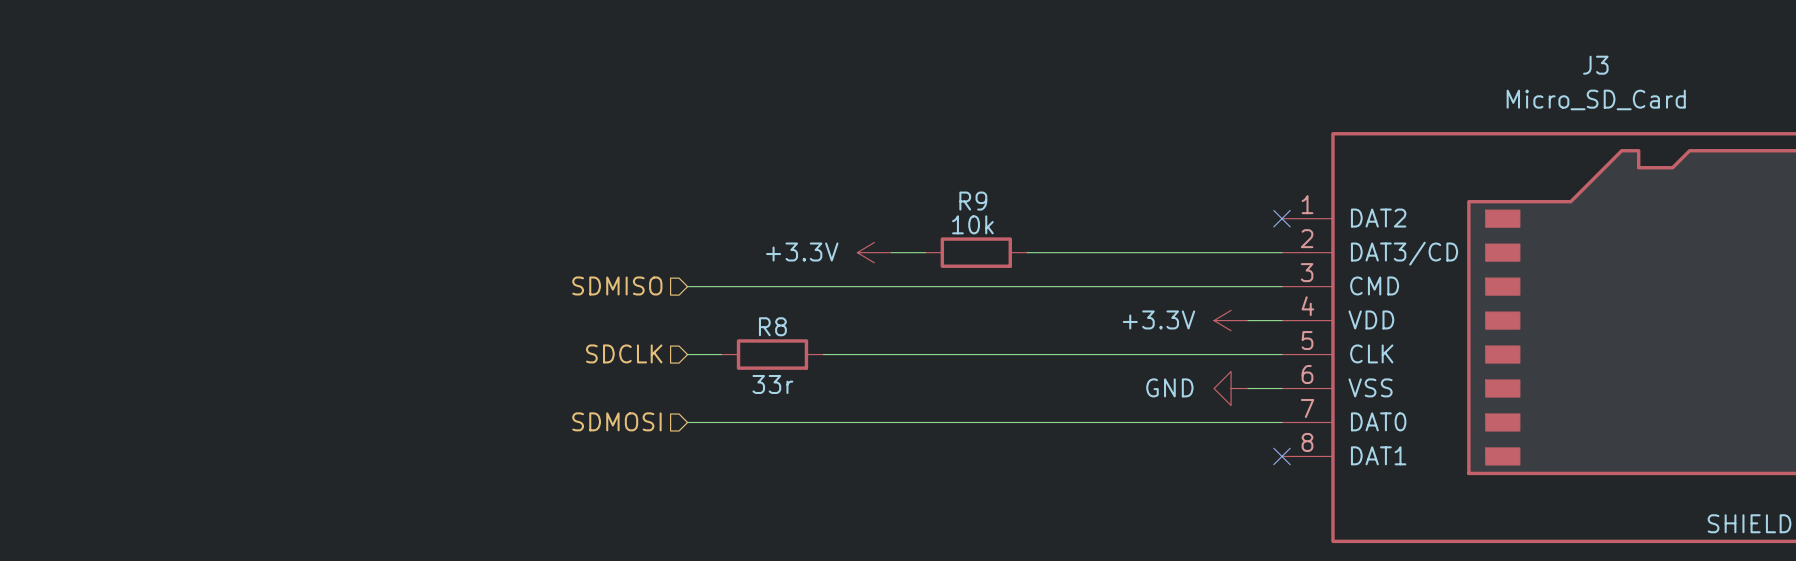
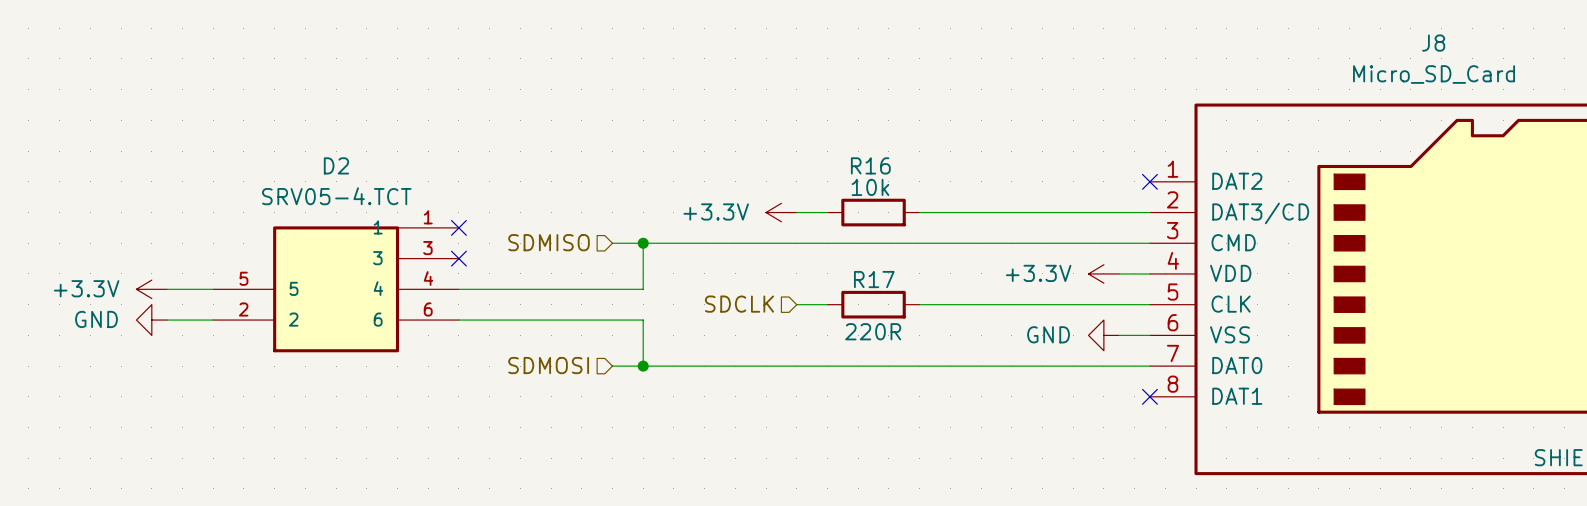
J3 name: J3 (1595, 65) -> J8 (1433, 43)
R9 name: R9 (973, 201) -> R16 (870, 165)
no-connect mark: none -> (458, 227)
wire: none -> (643, 243) (643, 289) (458, 289)
junction: none -> (643, 243)
no-connect mark: none -> (458, 258)
power symbol: none -> +3.3V (151, 289)
wire: none -> (167, 289) (213, 289)
D2: none -> SRV05-4.TCT (336, 289)
hierarchical label position: SDCLK (624, 353) -> SDCLK (739, 304)
wire: (687, 354) (721, 354) -> none
R8: 33r (772, 354) -> none
wire: (823, 354) (891, 354) -> none
wire: (925, 354) (1027, 354) -> none
R17: none -> 220R (873, 304)
power symbol: none -> GND (151, 320)
wire: none -> (167, 320) (213, 320)
wire: none -> (458, 320) (643, 320) (643, 366)
junction: none -> (643, 366)

